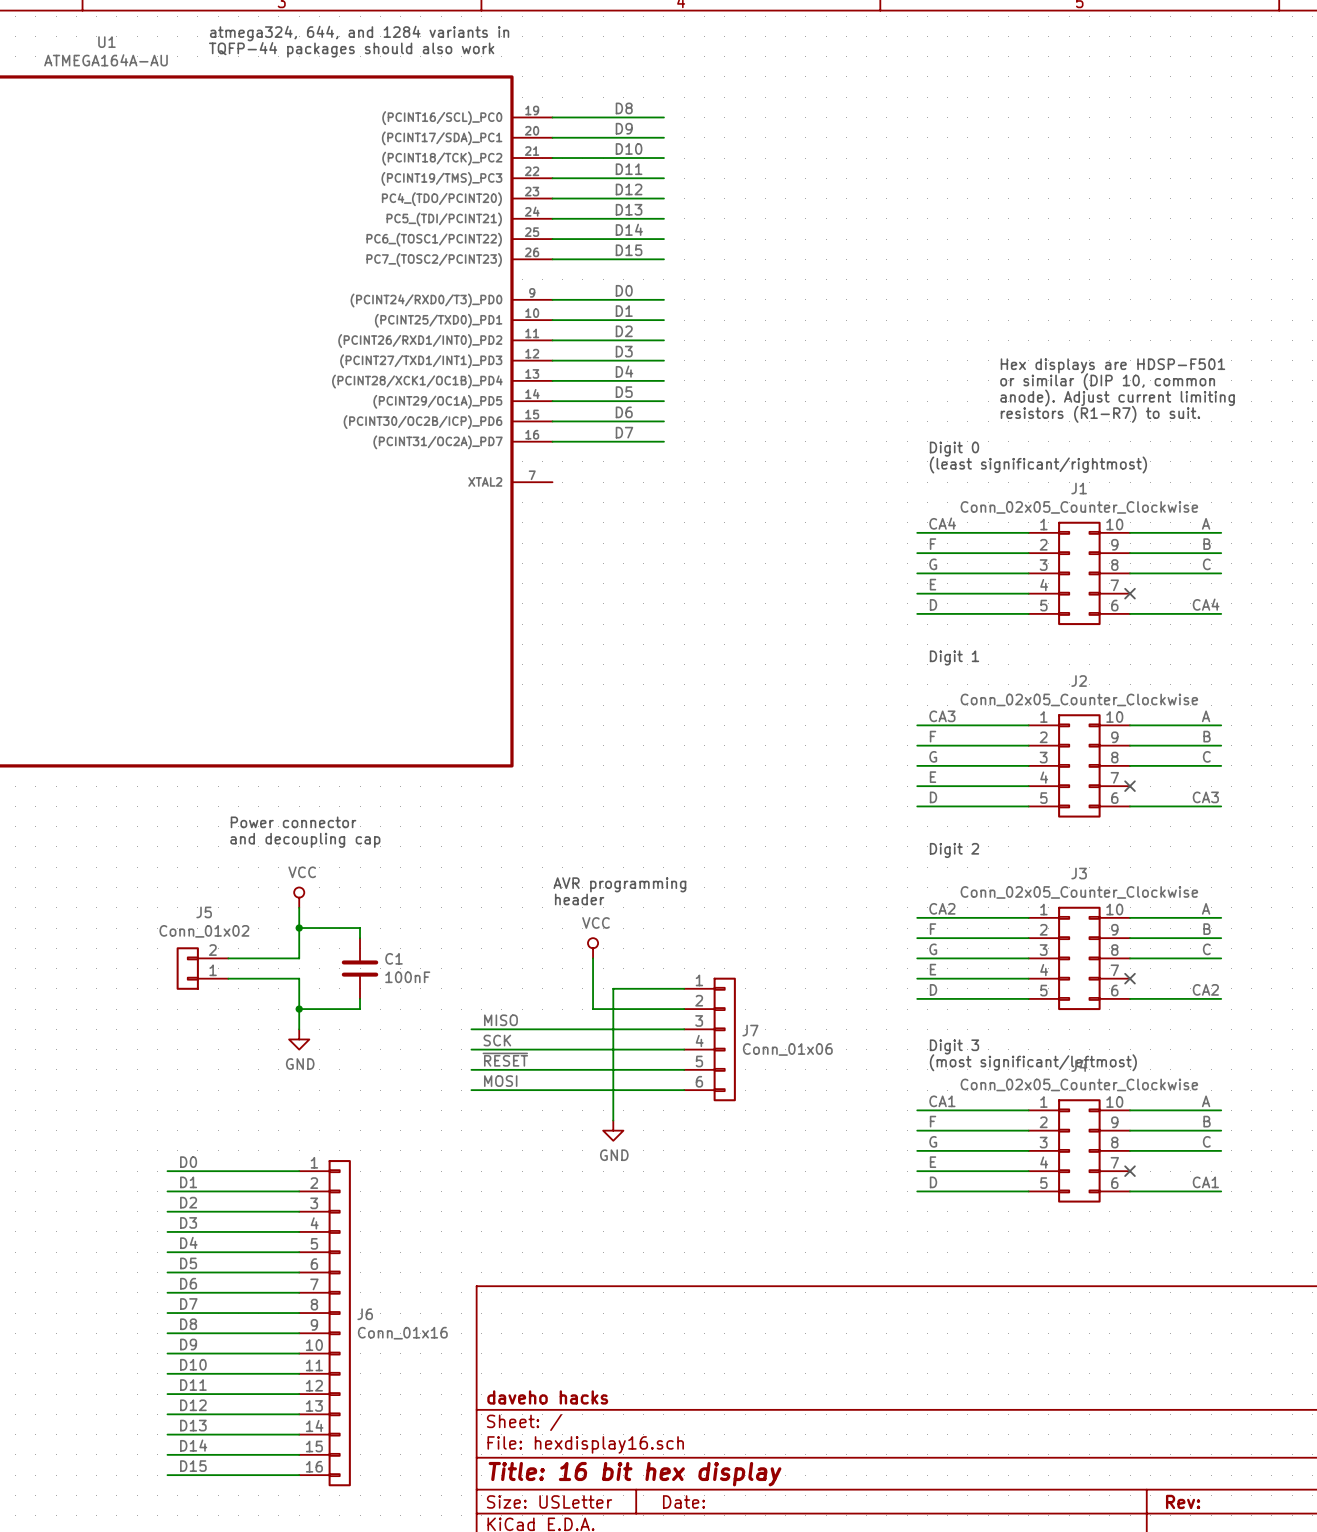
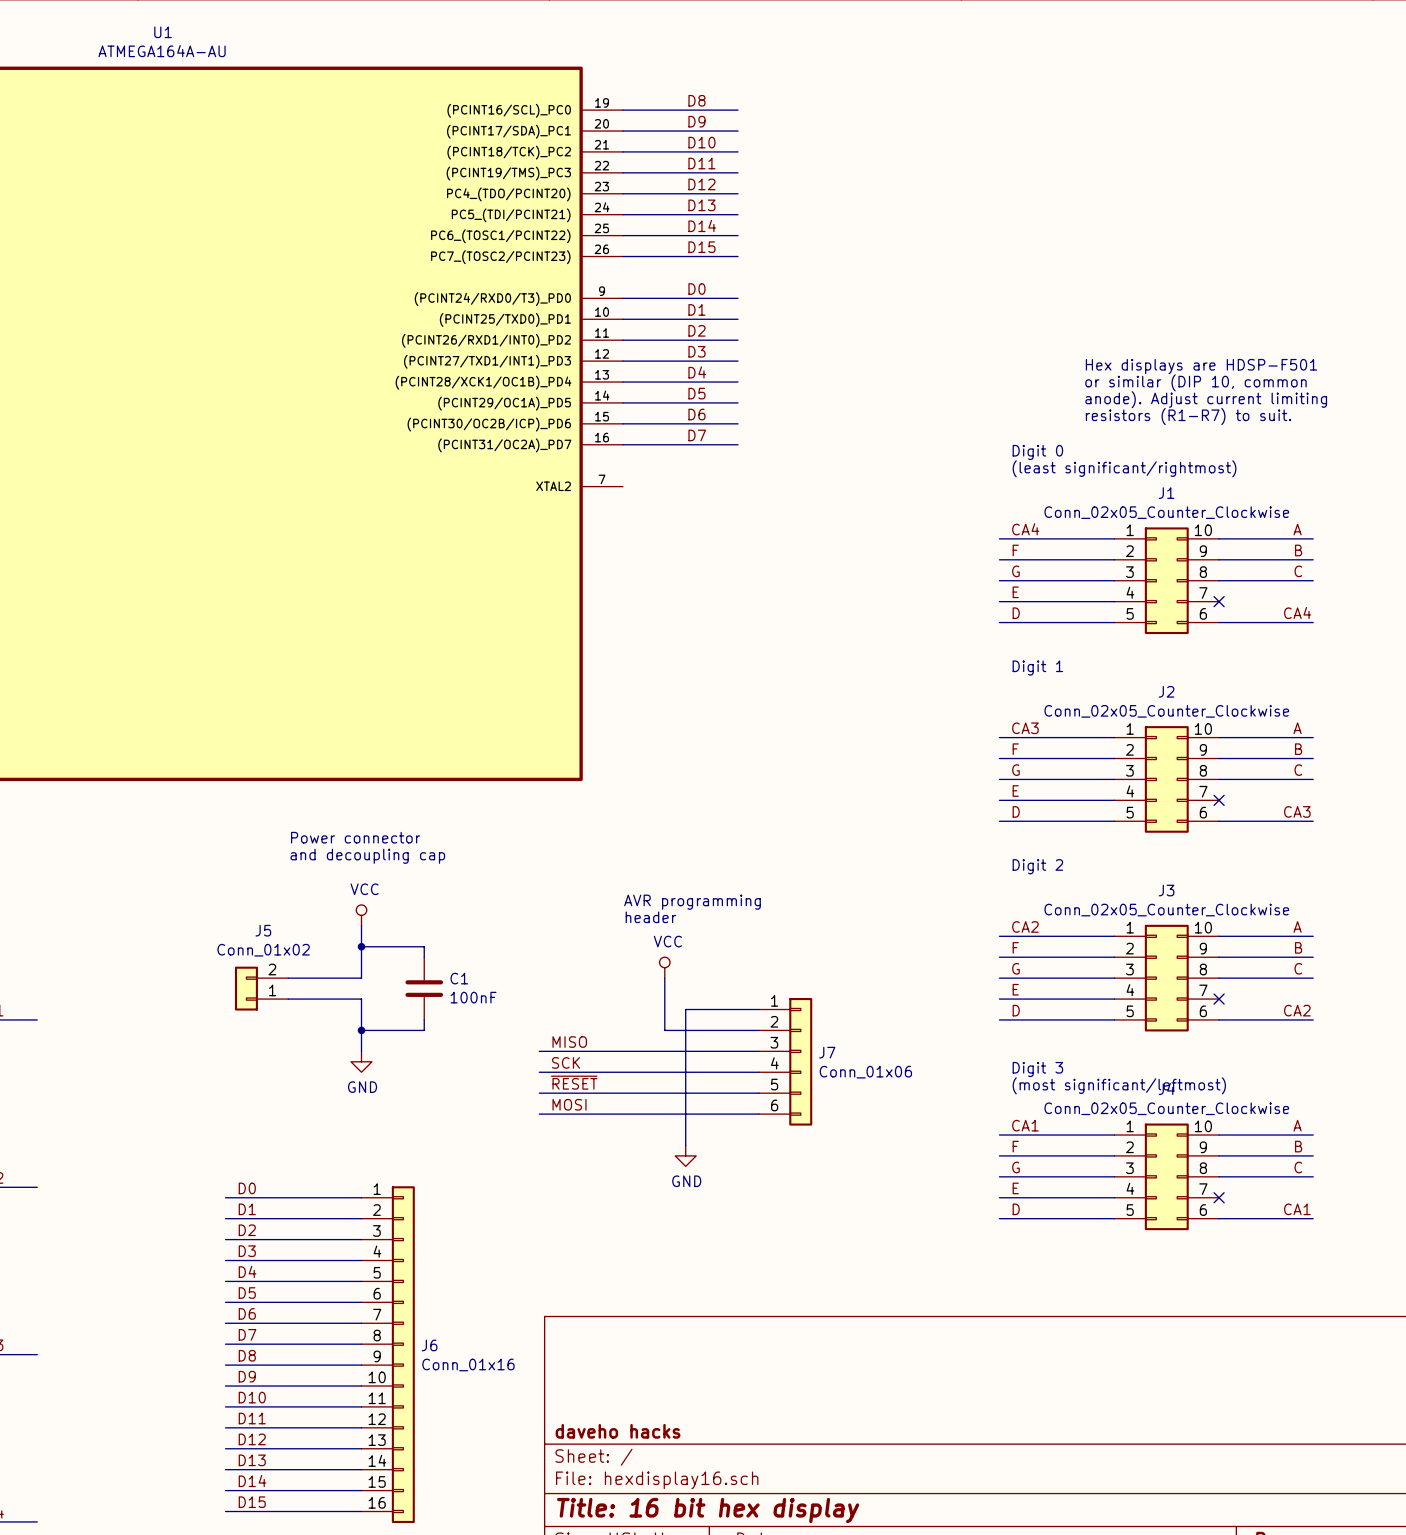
text: atmega324, 644, and 1284 variants in (359, 33) -> none
text: TQFP-44 packages should also work (351, 49) -> none

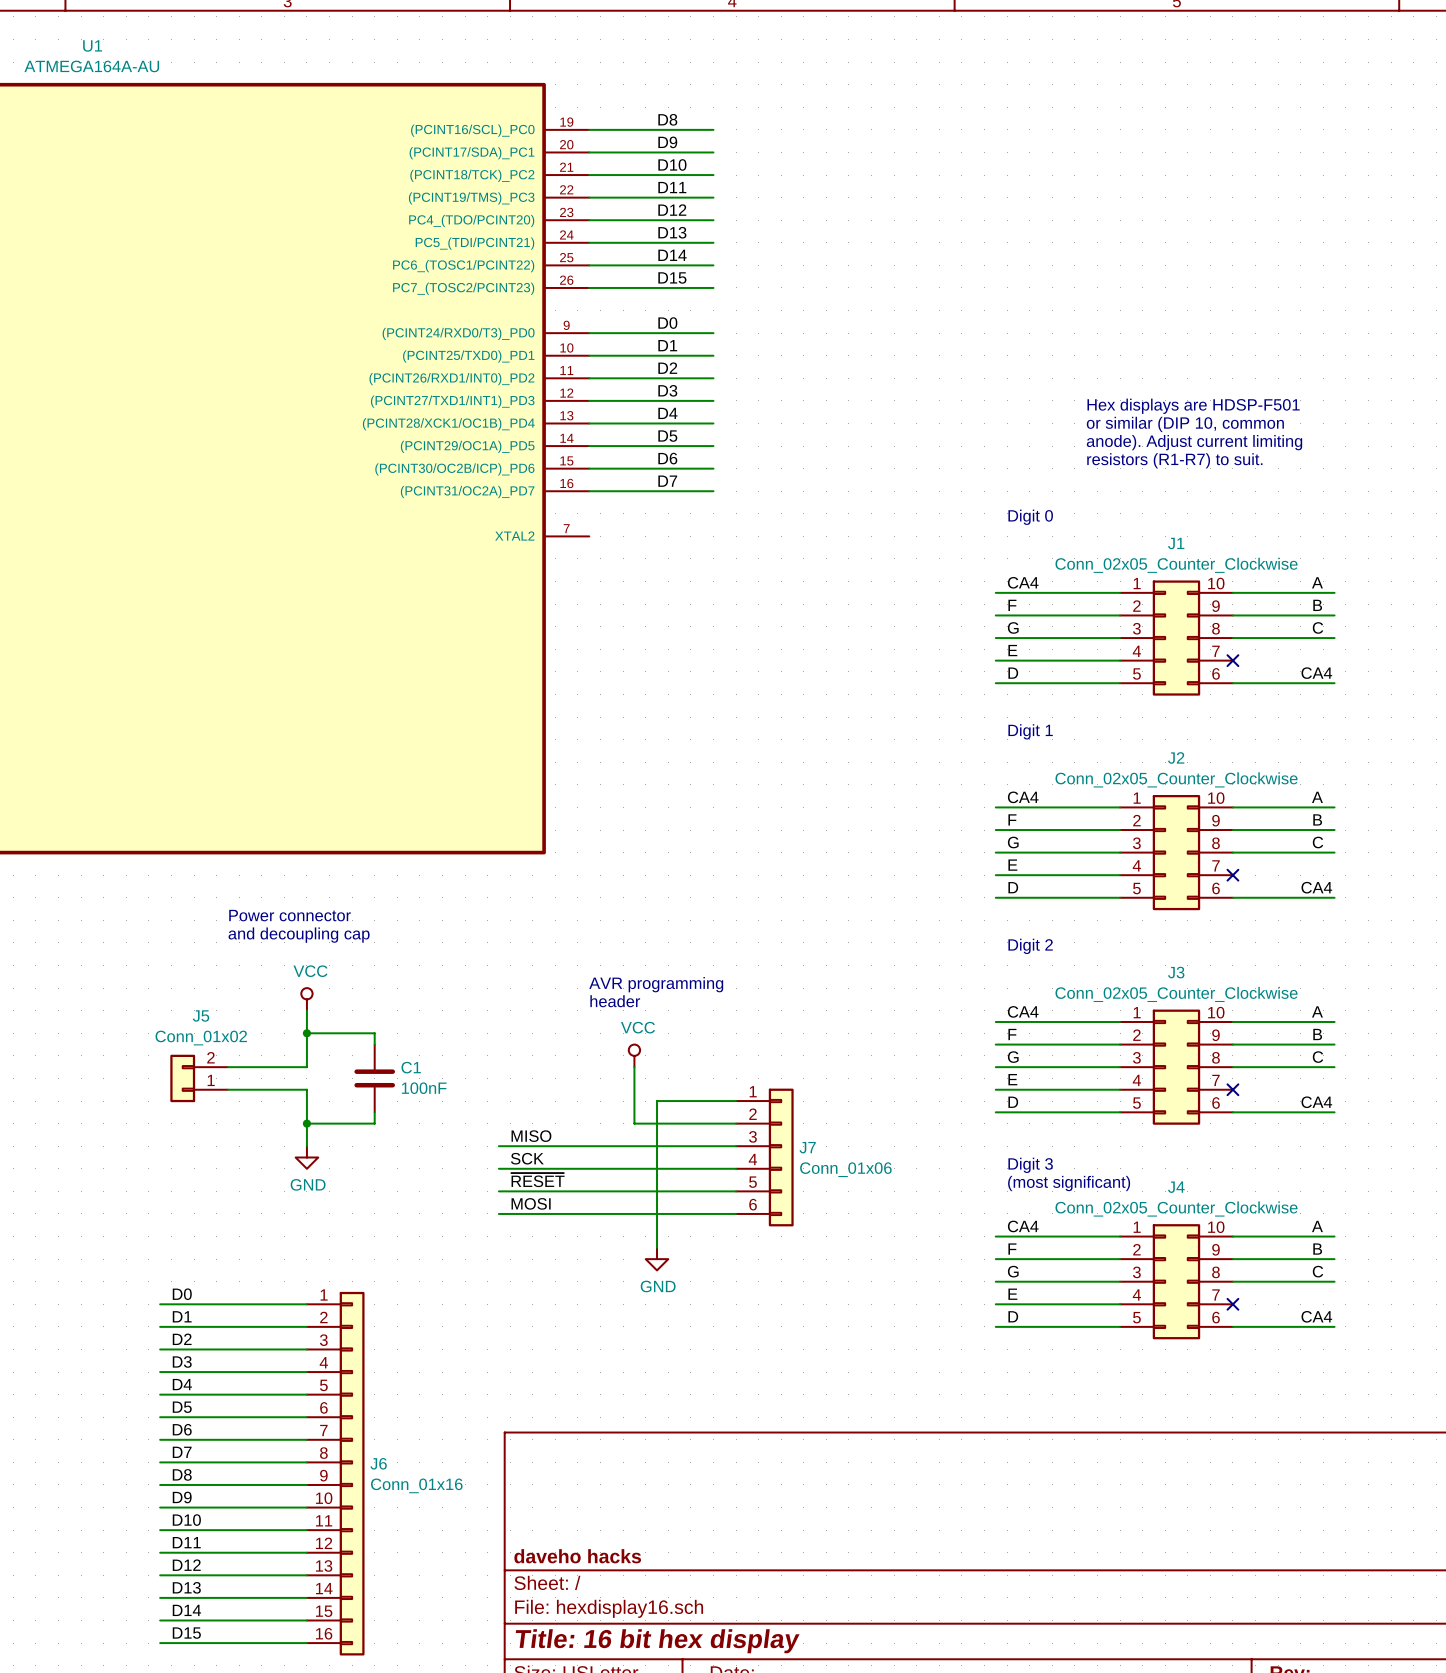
text: Digit 0 (1037, 452) -> none
text: (least significant/rightmost) (1124, 468) -> Digit 0 (1030, 517)
label: CA3 (1025, 728) -> CA4 (1023, 797)
label: CA3 (1297, 811) -> CA4 (1316, 887)
label: CA2 (1025, 926) -> CA4 (1023, 1011)
label: CA2 (1297, 1010) -> CA4 (1316, 1102)
text: (most significant/leftmost) (1119, 1085) -> (most significant) (1069, 1183)
label: CA1 (1025, 1125) -> CA4 (1023, 1226)
label: CA1 (1297, 1209) -> CA4 (1316, 1316)

